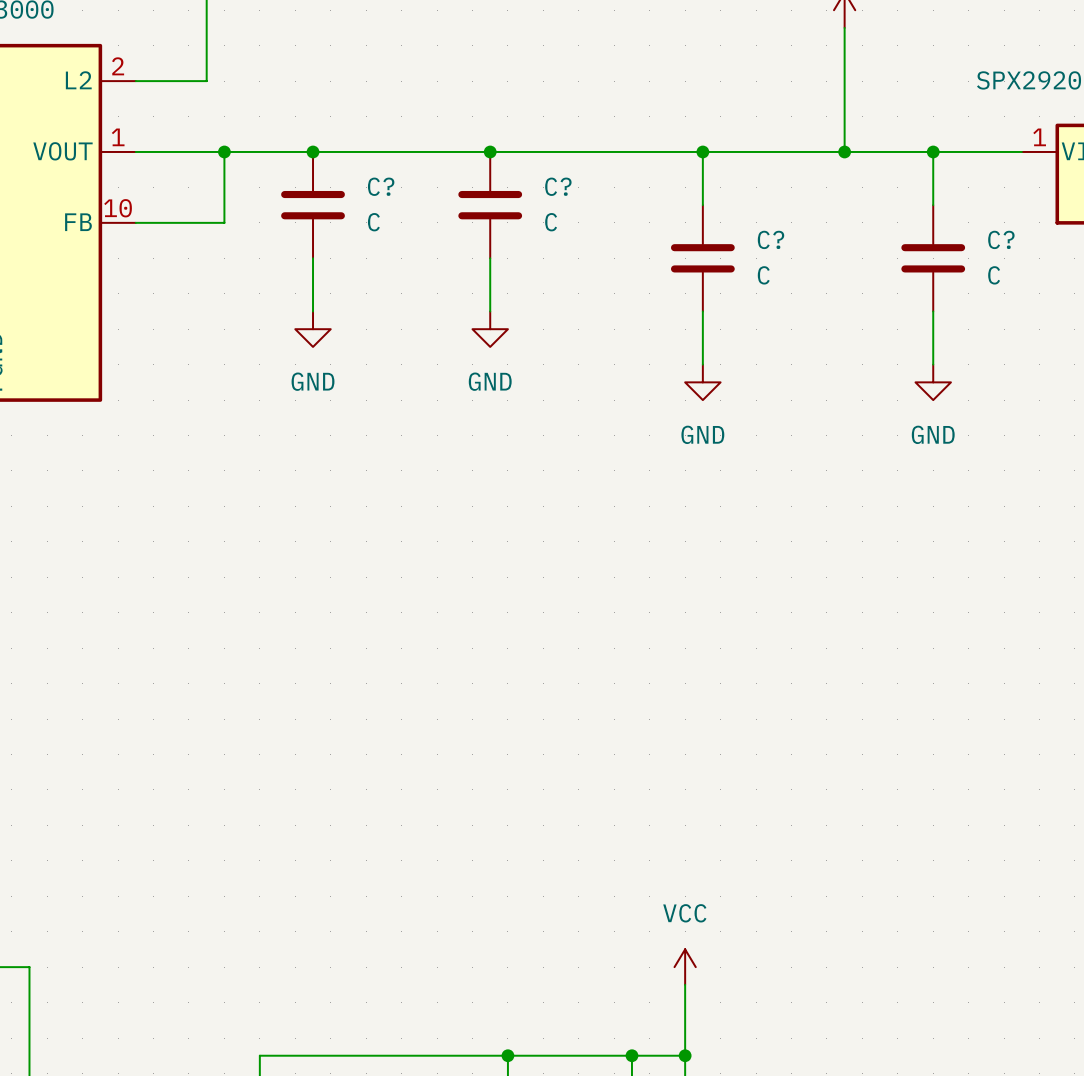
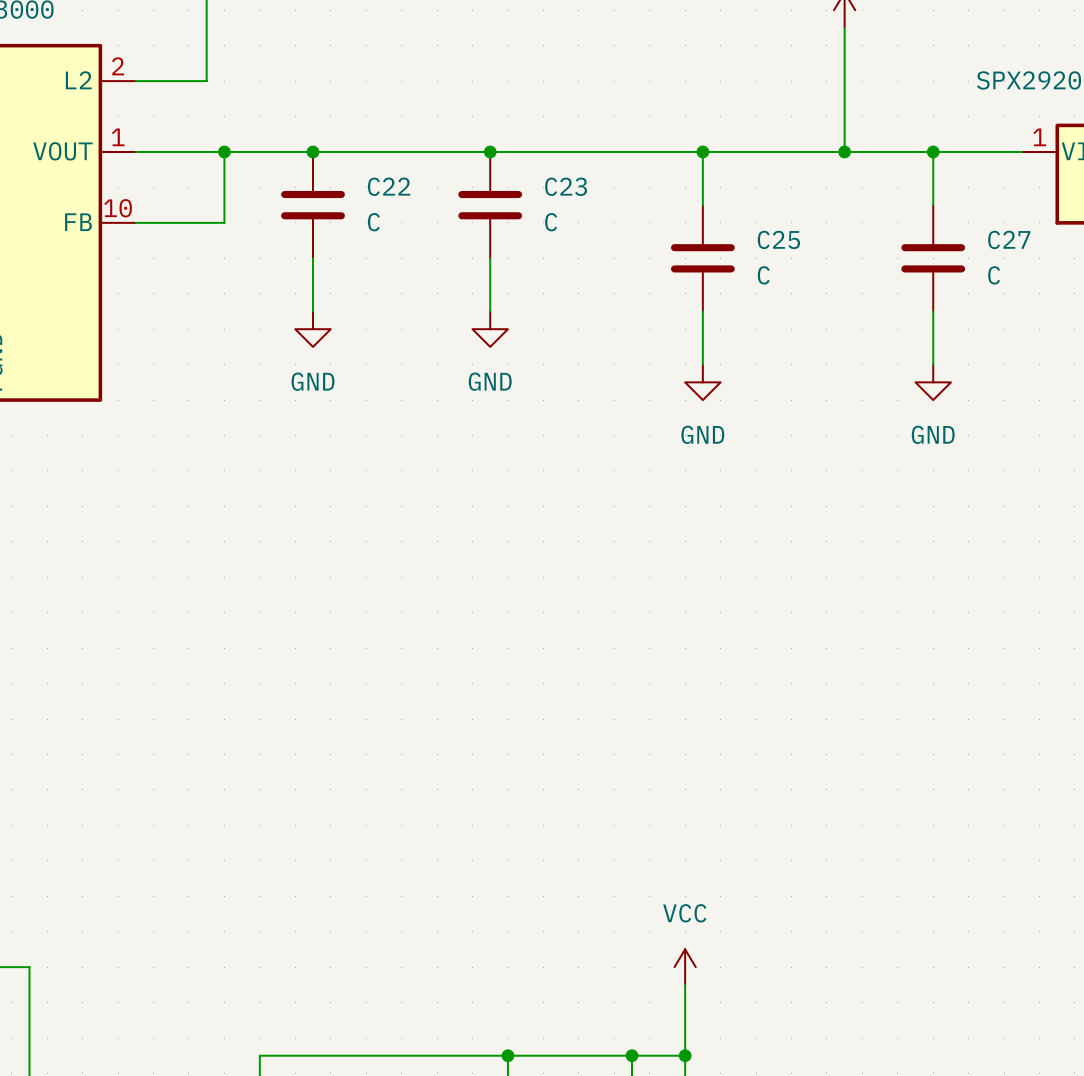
C? name: C? (381, 186) -> C22 (389, 186)
C? name: C? (558, 186) -> C23 (566, 186)
C? name: C? (771, 239) -> C25 (778, 239)
C? name: C? (1001, 239) -> C27 (1009, 239)

